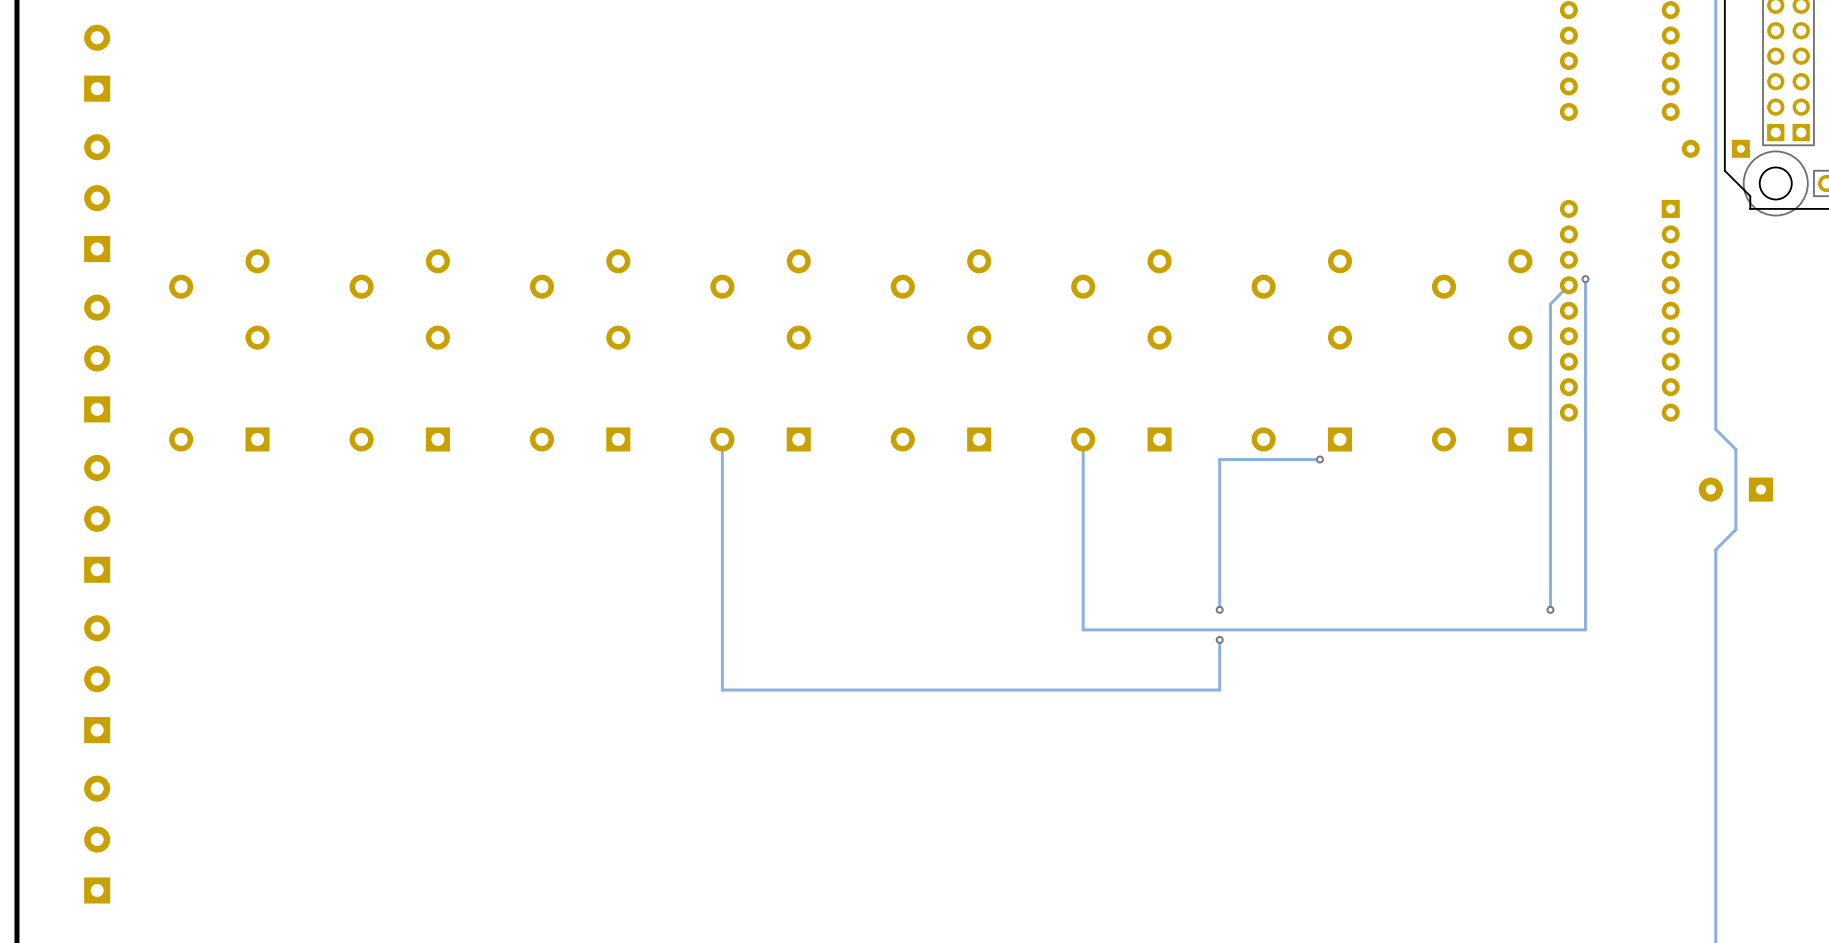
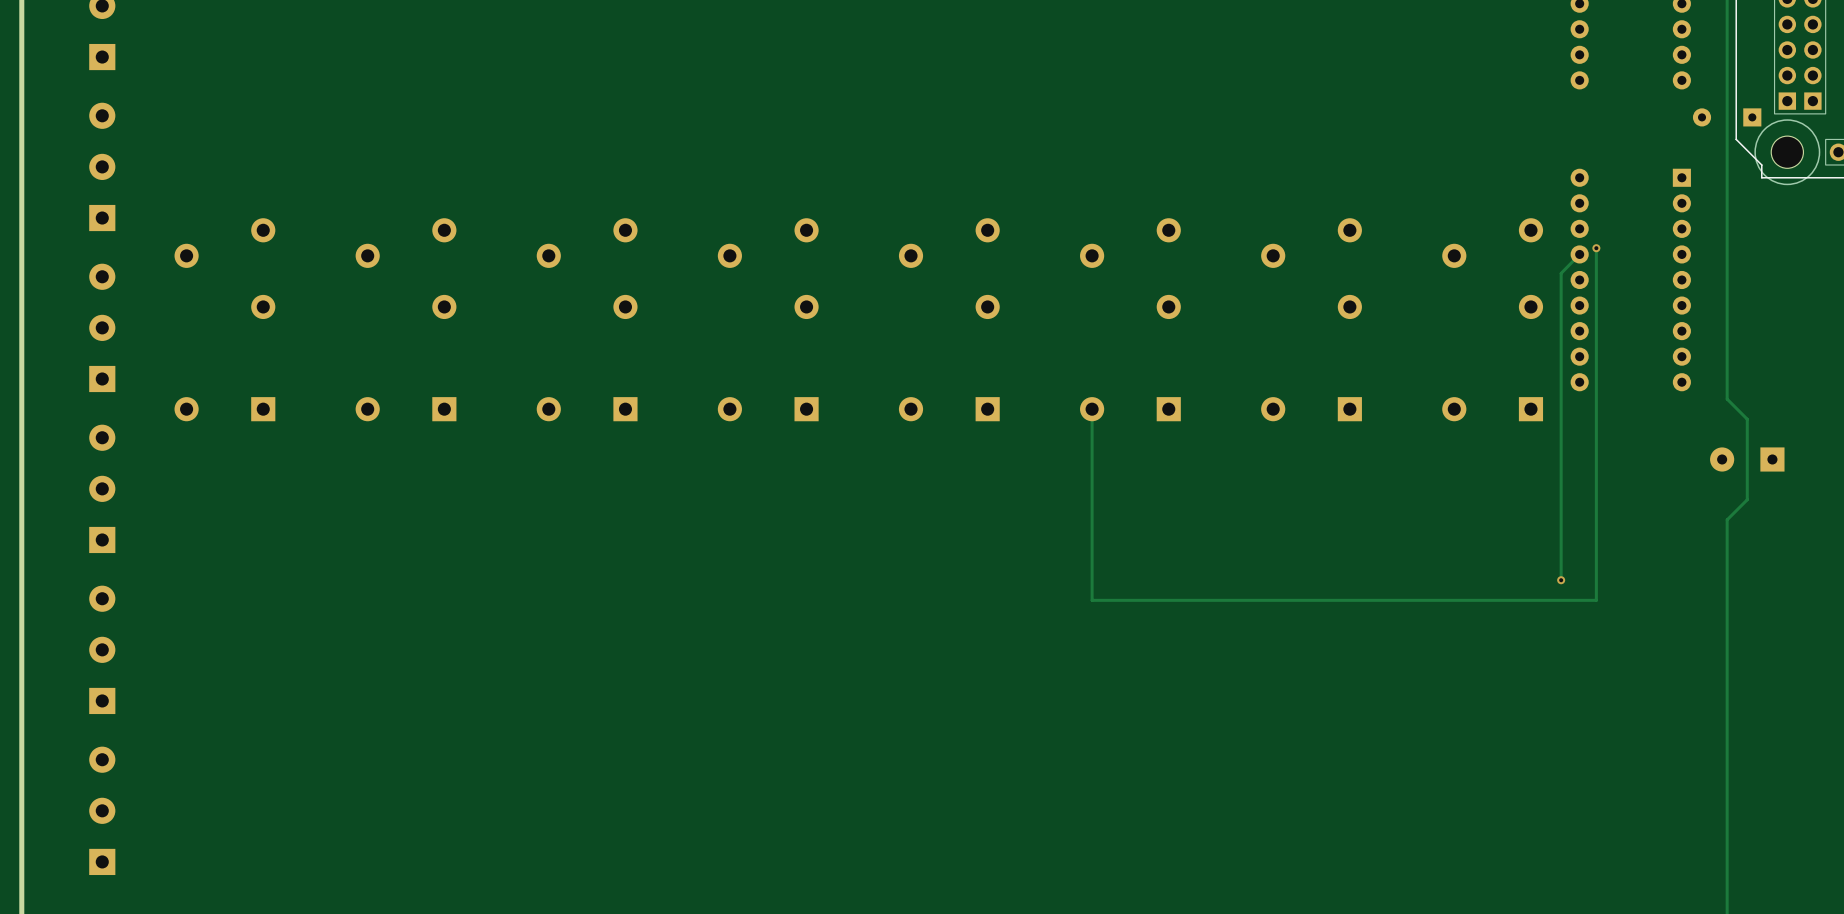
track: (722, 439) (722, 690) (1219, 690) (1219, 639) -> none
track: (1319, 459) (1219, 459) (1219, 609) -> none
via: (1319, 459) -> none
via: (1219, 609) -> none
via: (1219, 639) -> none

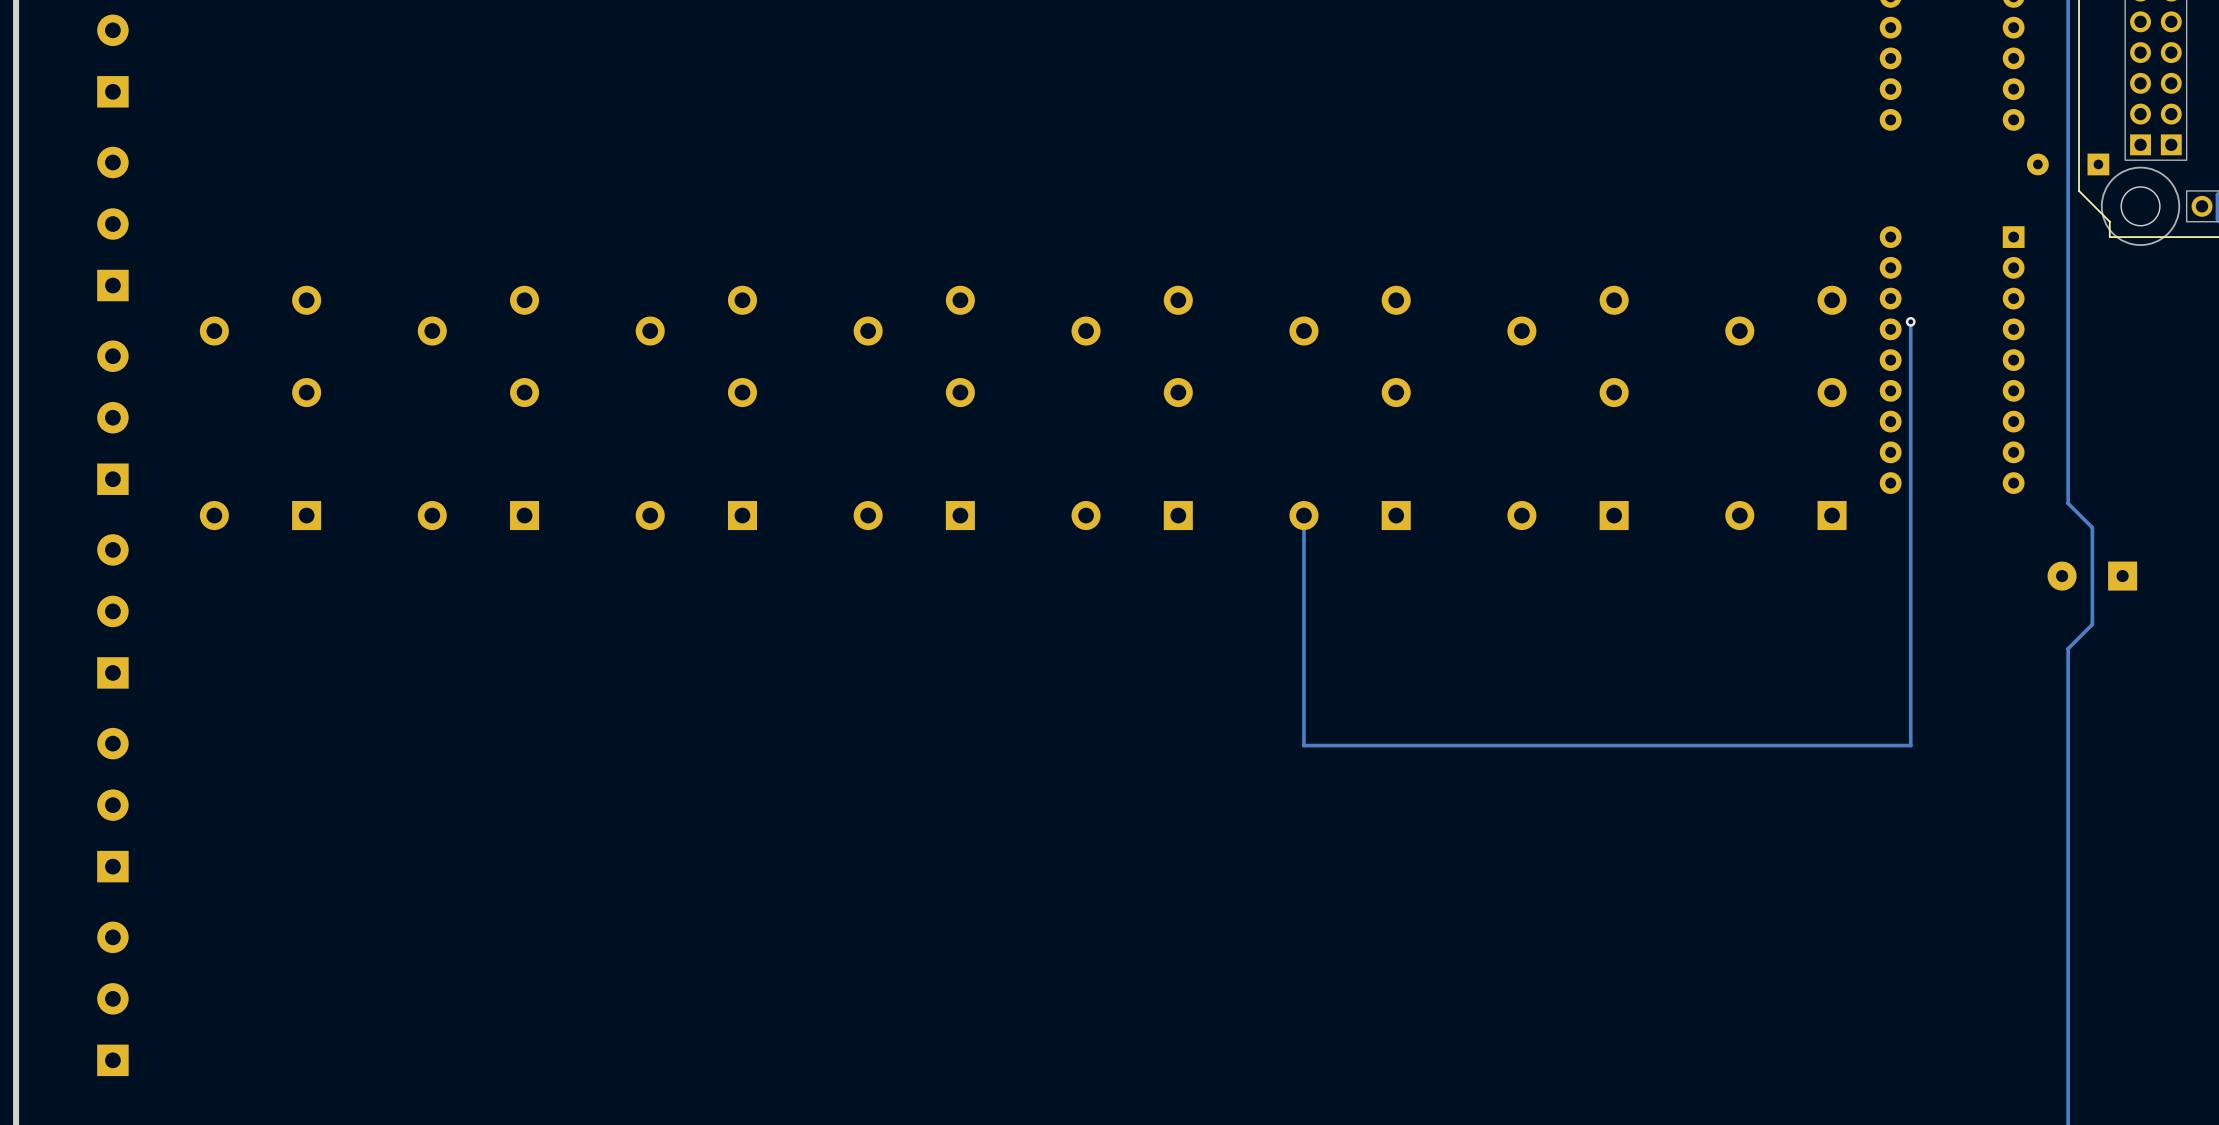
track: (1579, 254) (1561, 273) (1561, 580) -> none
via: (1561, 580) -> none

